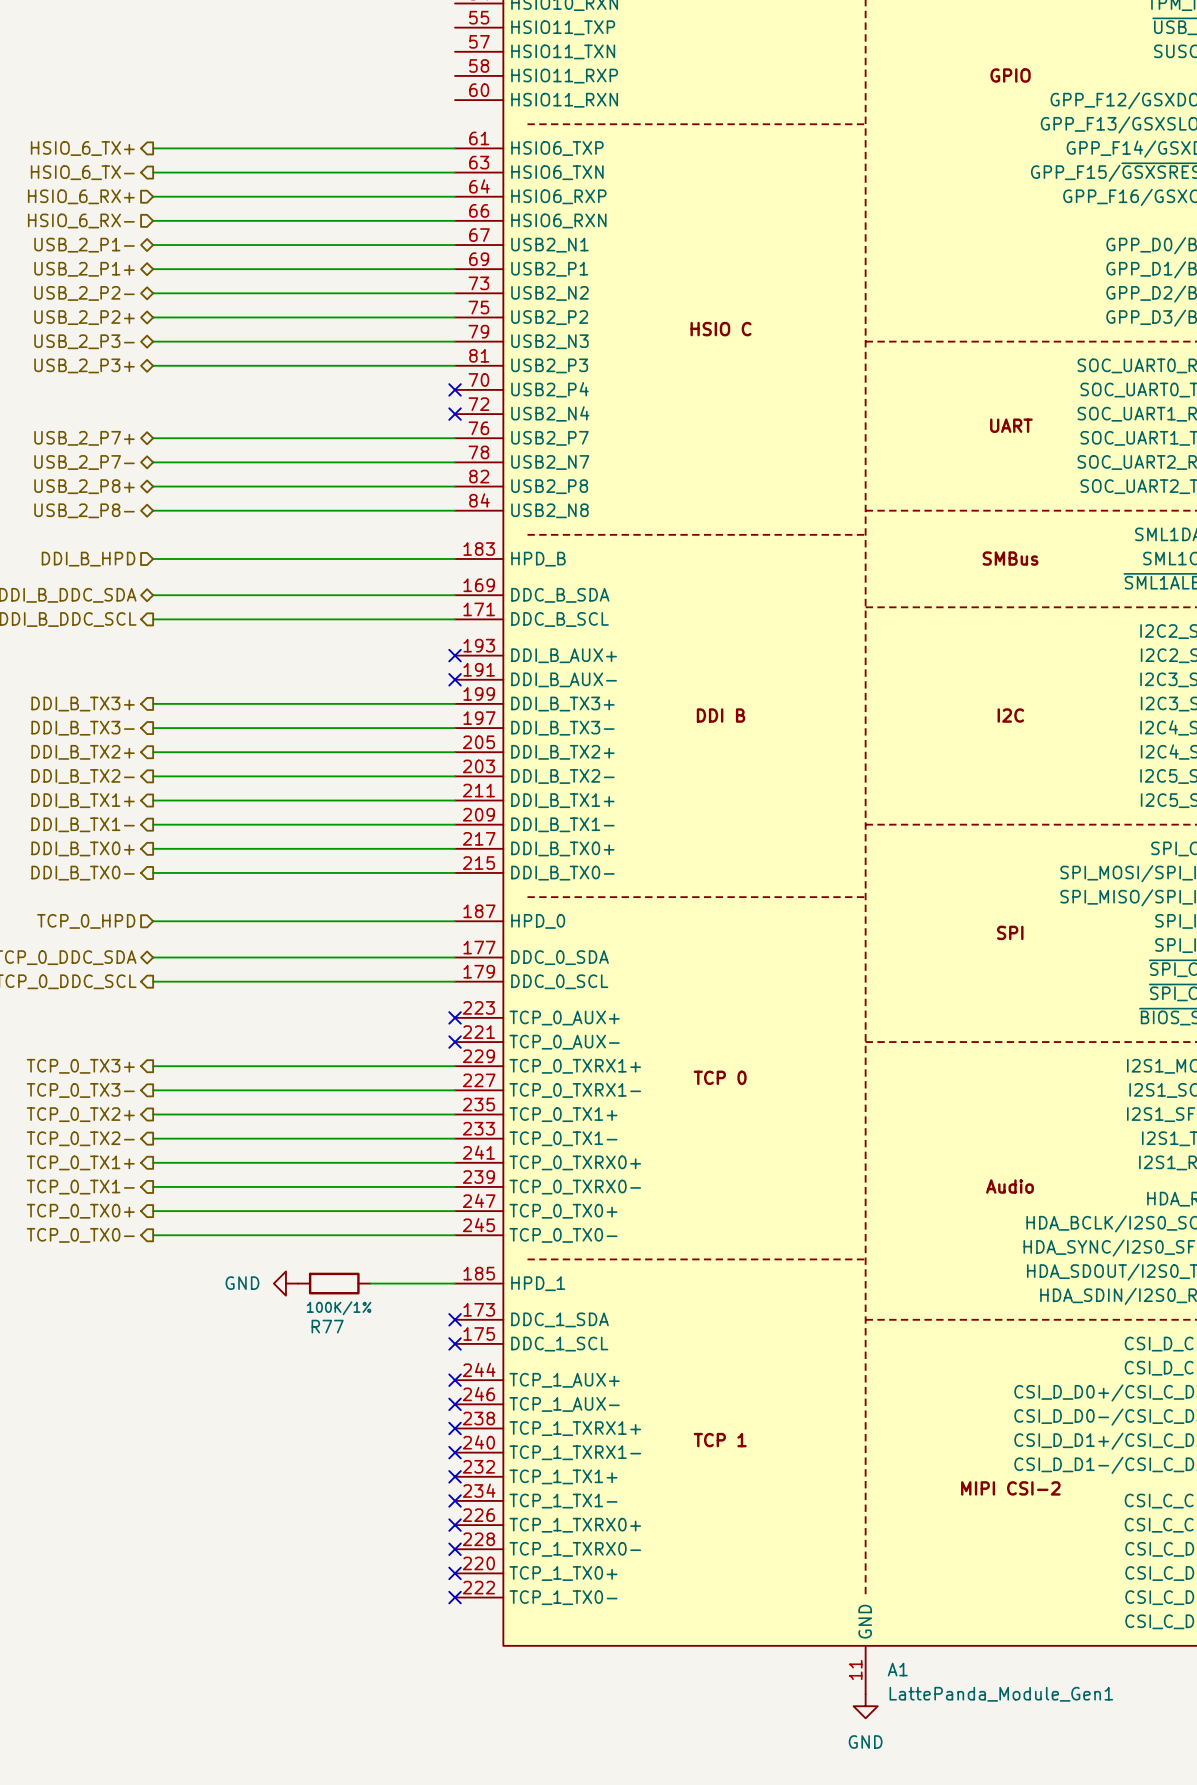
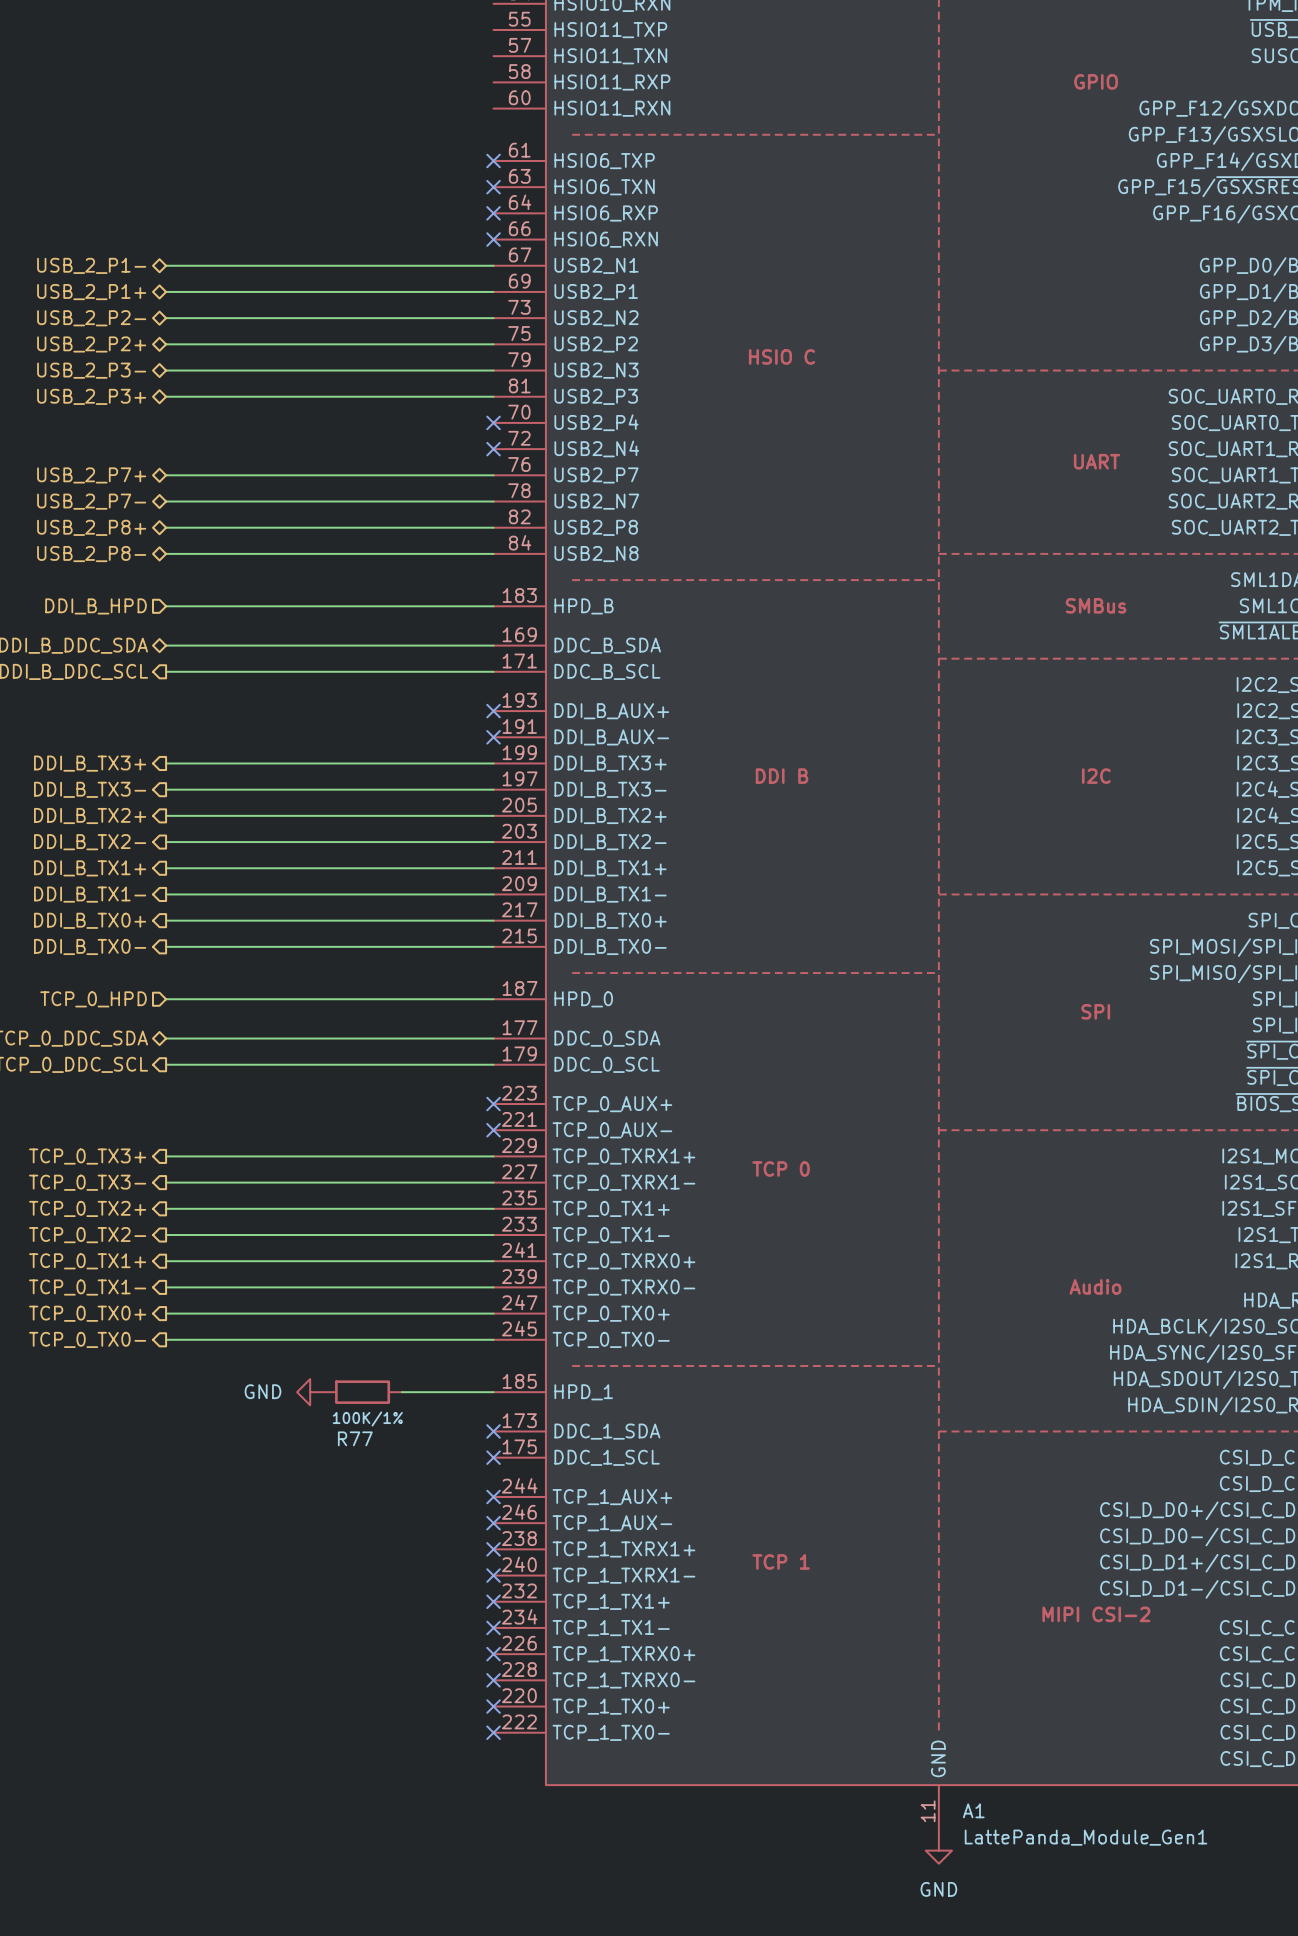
hierarchical label: HSIO_6_TX+ (82, 148) -> none
wire: (153, 148) (455, 148) -> none
no-connect mark: none -> (493, 160)
hierarchical label: HSIO_6_TX- (82, 172) -> none
wire: (153, 172) (455, 172) -> none
no-connect mark: none -> (493, 187)
hierarchical label: HSIO_6_RX+ (81, 196) -> none
wire: (153, 196) (455, 196) -> none
no-connect mark: none -> (493, 213)
hierarchical label: HSIO_6_RX- (81, 220) -> none
wire: (153, 220) (455, 220) -> none
no-connect mark: none -> (493, 239)

